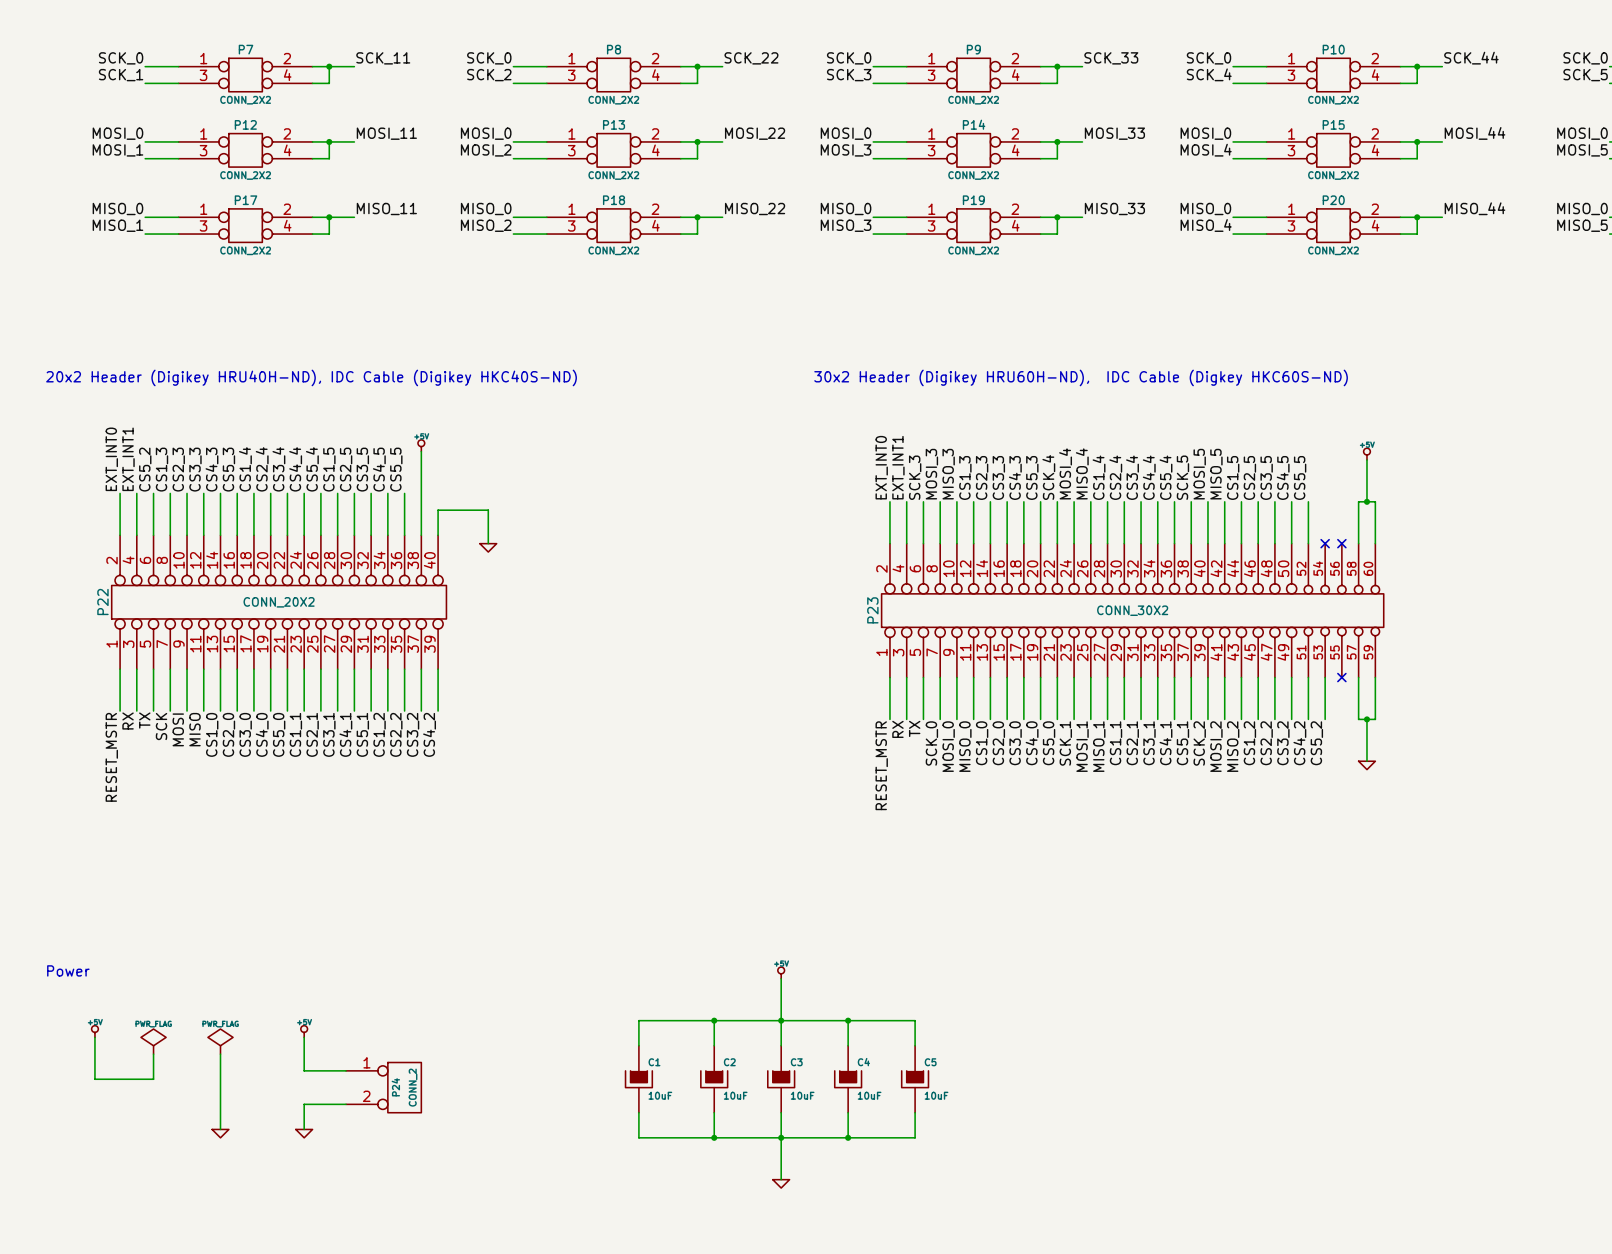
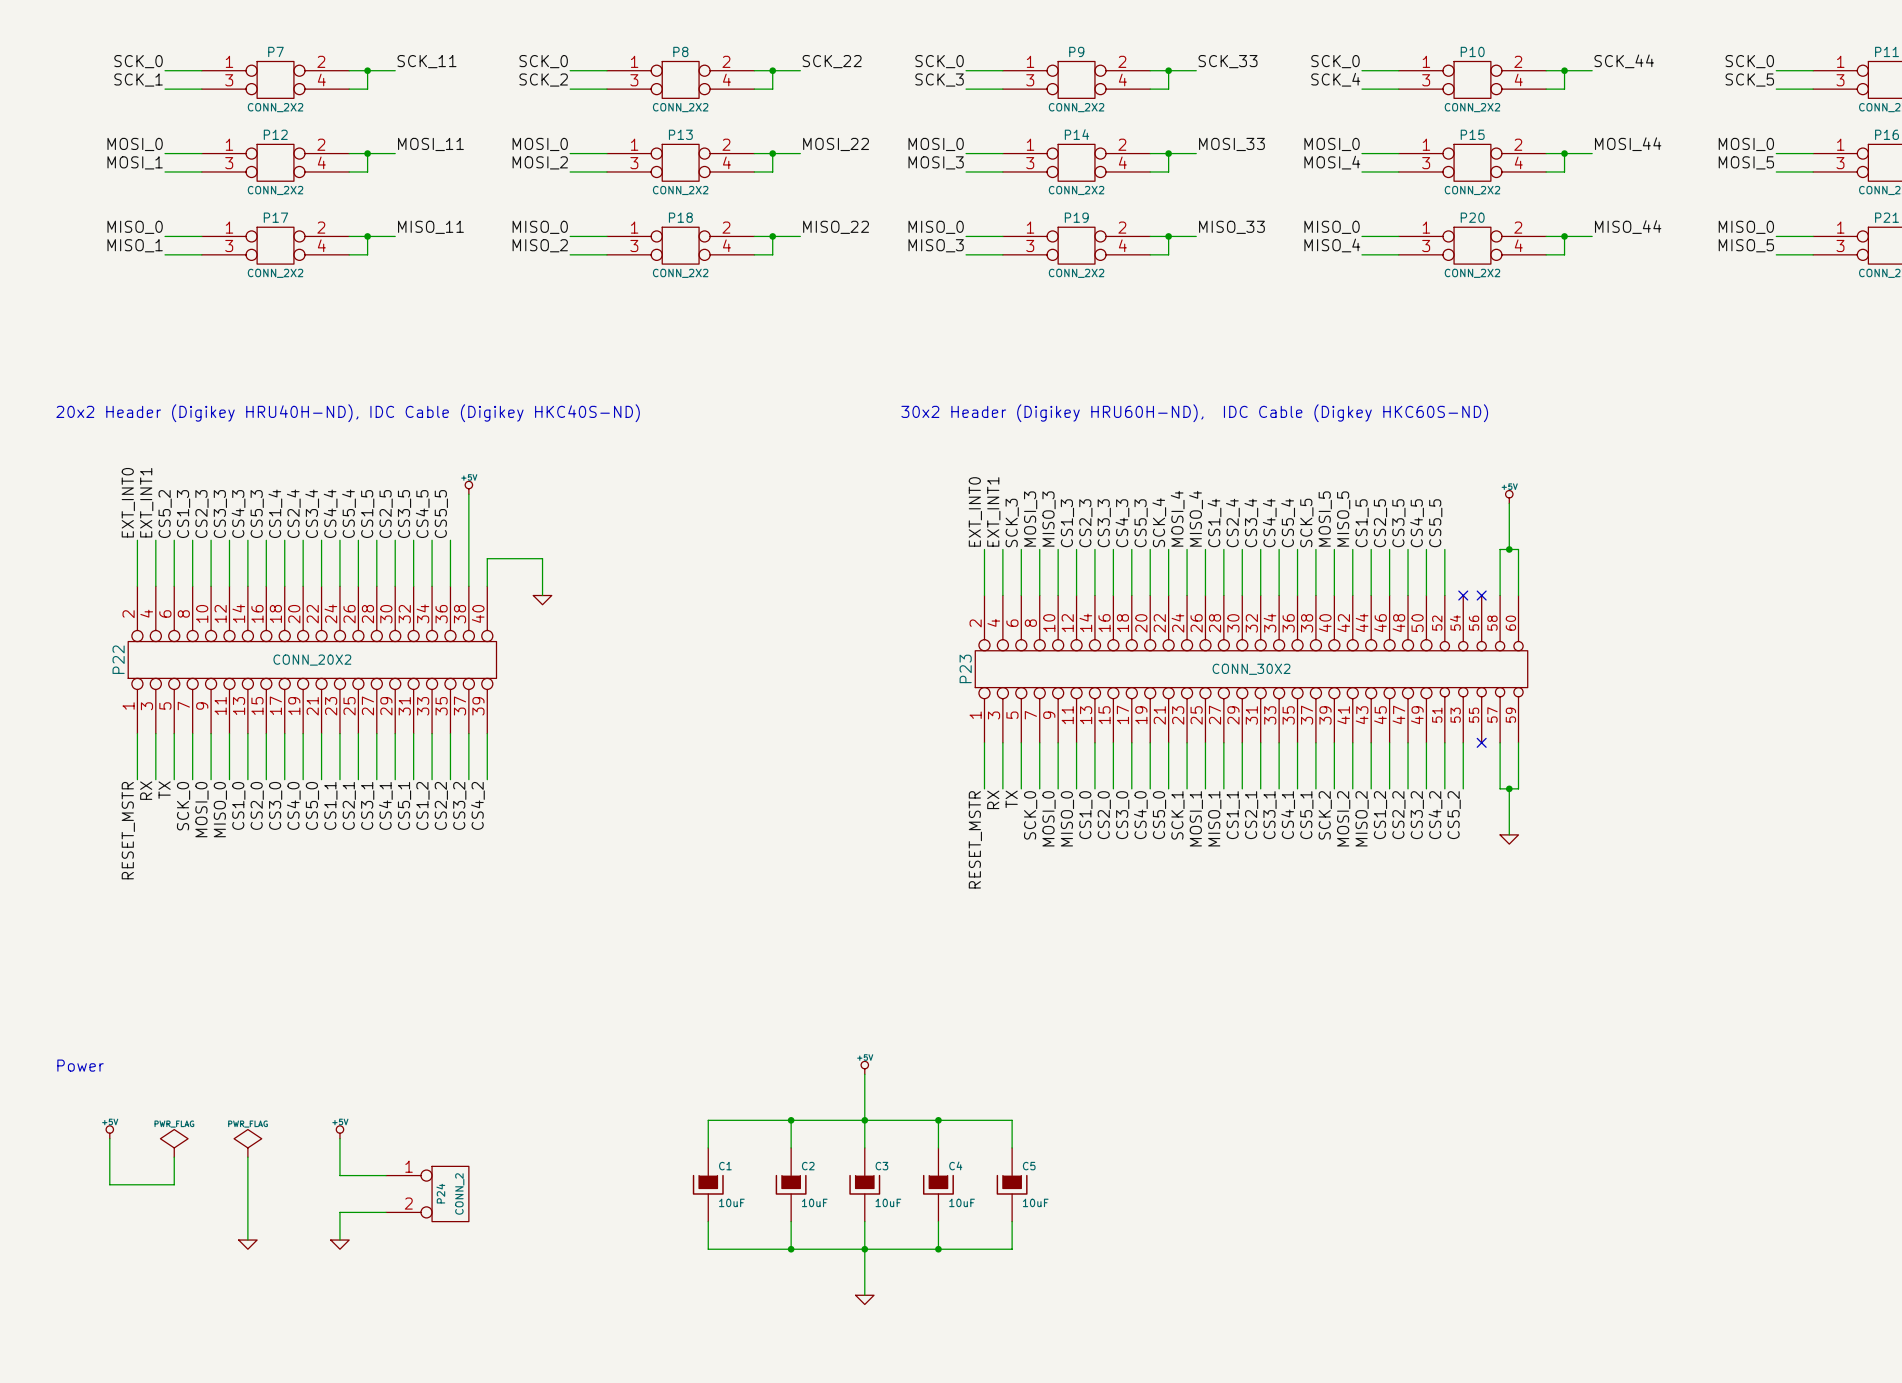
label: SCK (161, 726) -> SCK_0 (183, 806)
label: MOSI (178, 729) -> MOSI_0 (201, 809)
label: MISO (194, 729) -> MISO_0 (220, 809)

